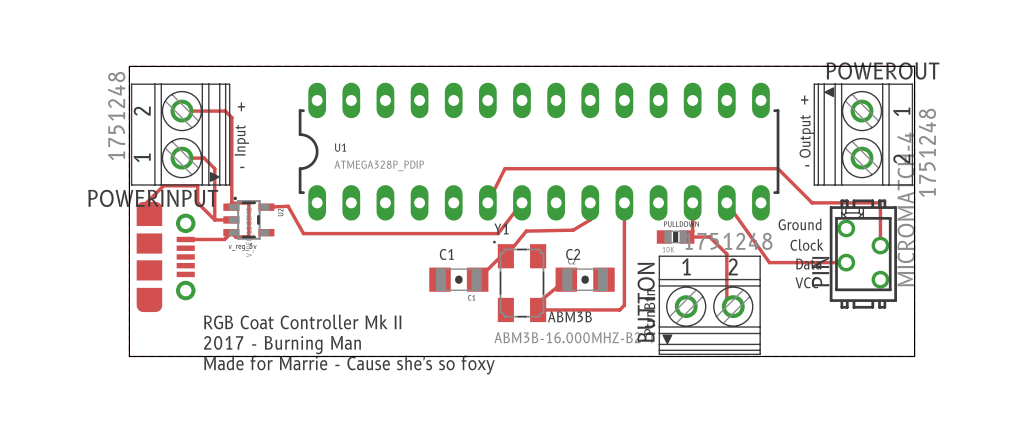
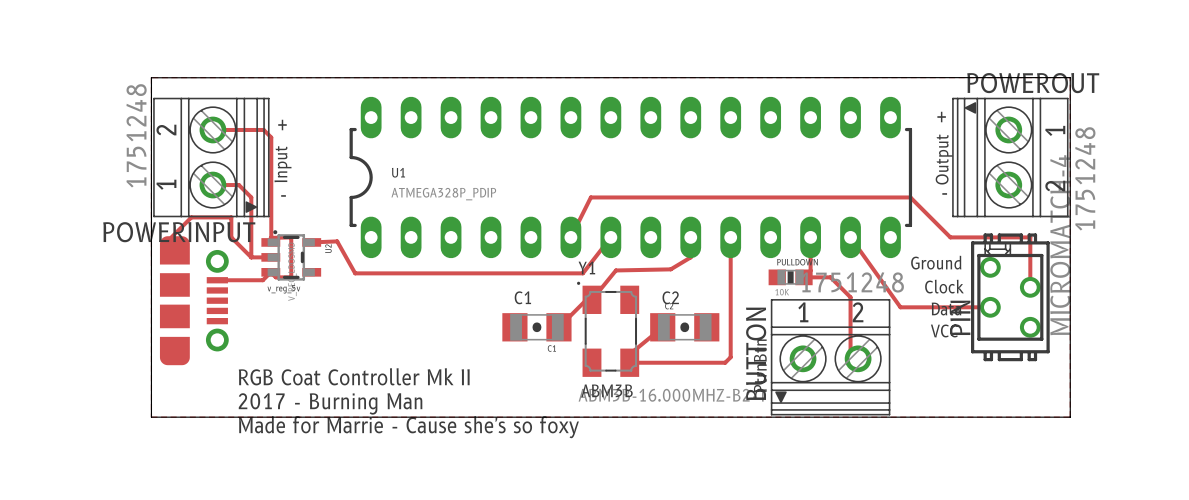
text position: ABM3B (569, 316) -> ABM3B (607, 390)

